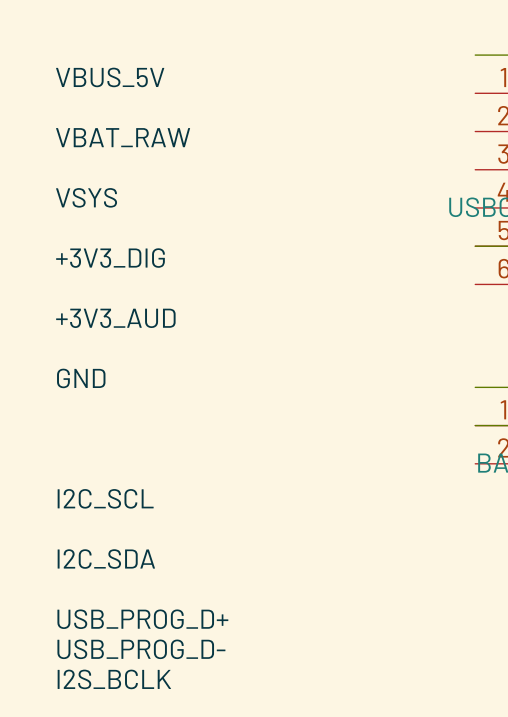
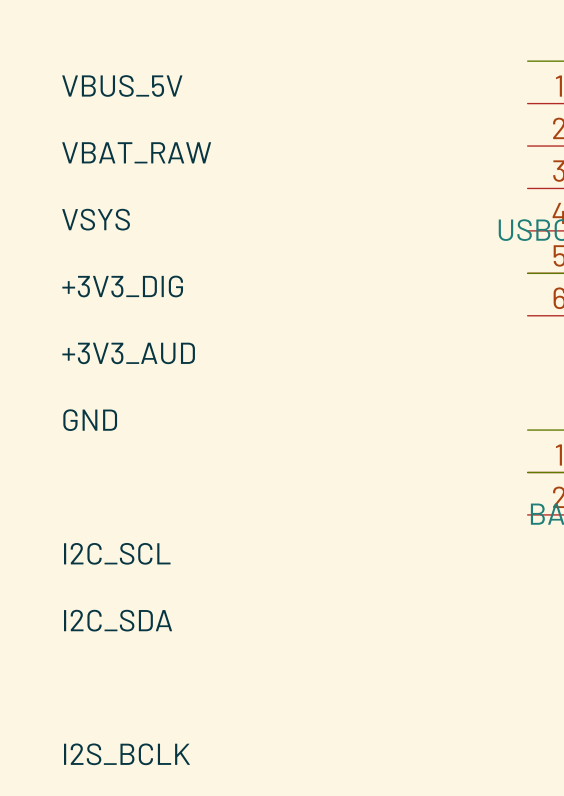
label: USB_PROG_D+ (142, 619) -> none
label: USB_PROG_D- (141, 649) -> none

